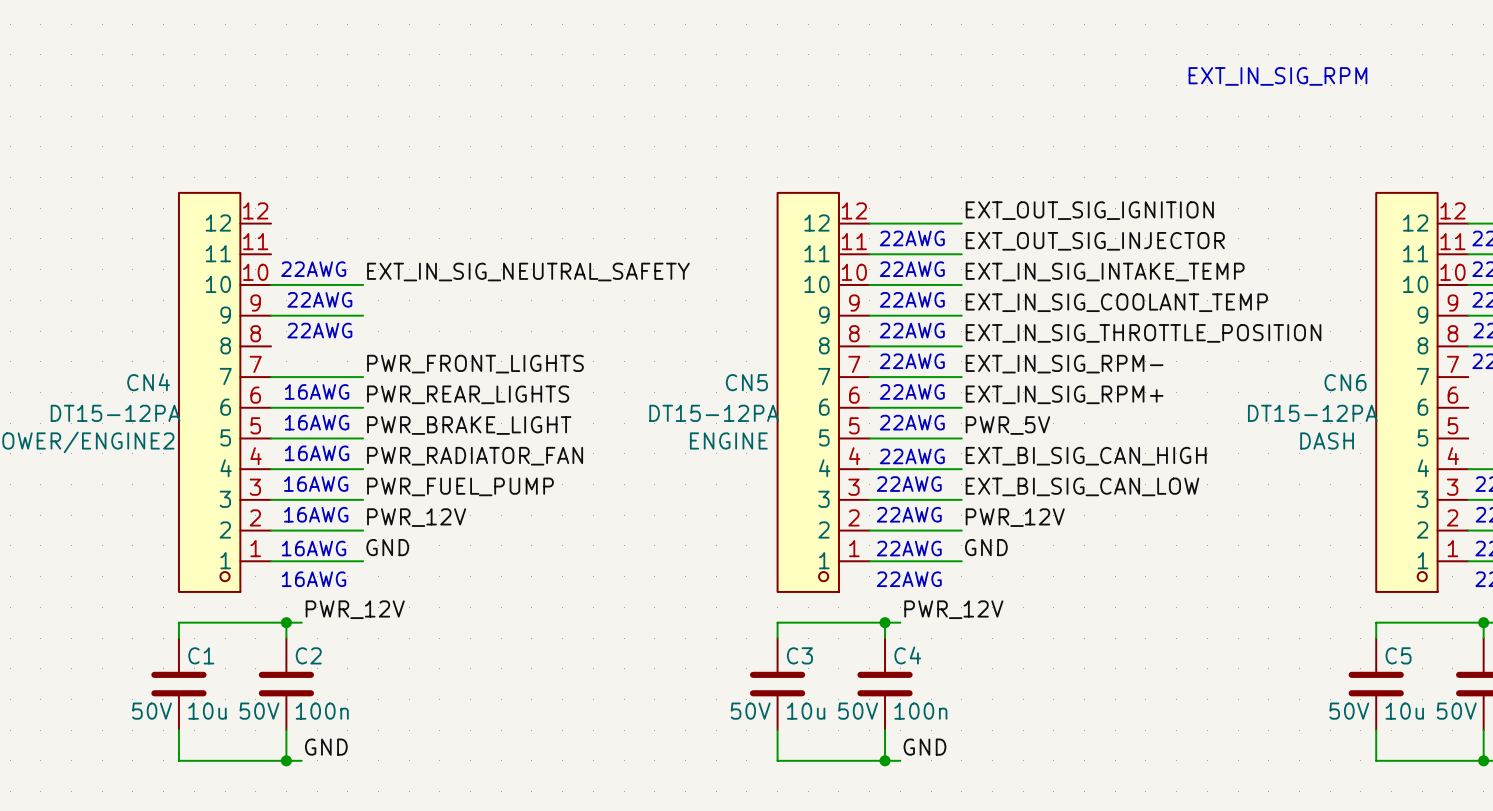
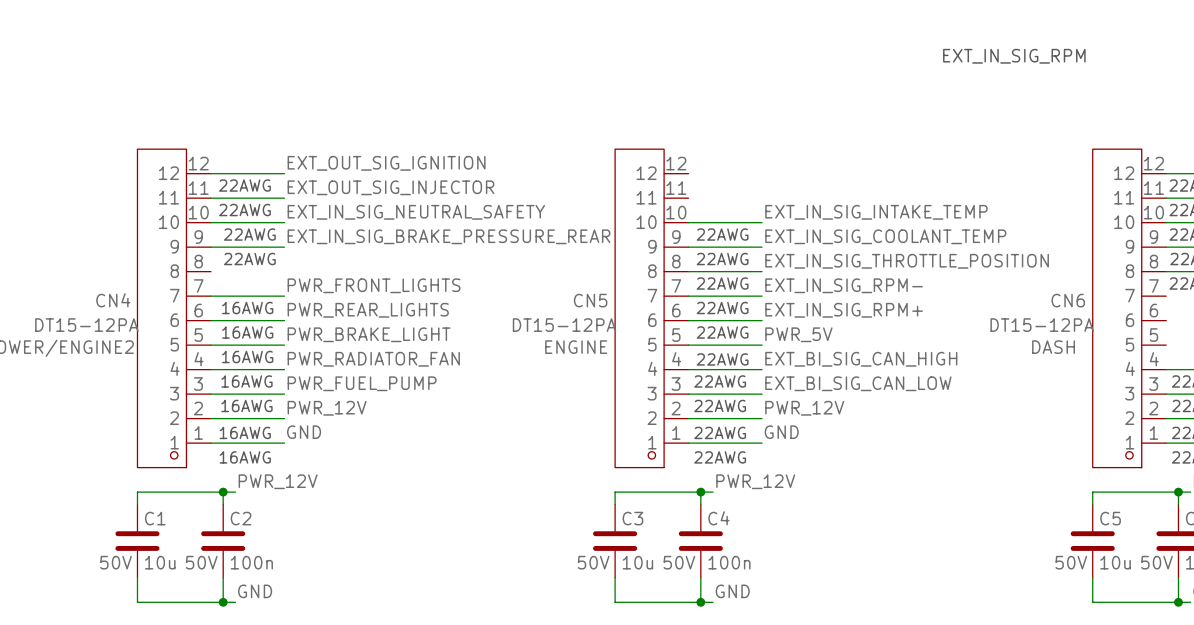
label: none -> EXT_OUT_SIG_IGNITION (386, 163)
label: EXT_OUT_SIG_IGNITION (1089, 210) -> none
wire: none -> (210, 173) (284, 173)
wire: (869, 223) (961, 223) -> none
text: none -> 22AWG (244, 185)
text: 22AWG (912, 238) -> none
label: none -> EXT_OUT_SIG_INJECTOR (390, 187)
label: EXT_OUT_SIG_INJECTOR (1095, 241) -> none
wire: none -> (210, 198) (284, 198)
wire: (869, 254) (961, 254) -> none
text: 22AWG (912, 269) -> none
label: none -> EXT_IN_SIG_BRAKE_PRESSURE_REAR (448, 236)

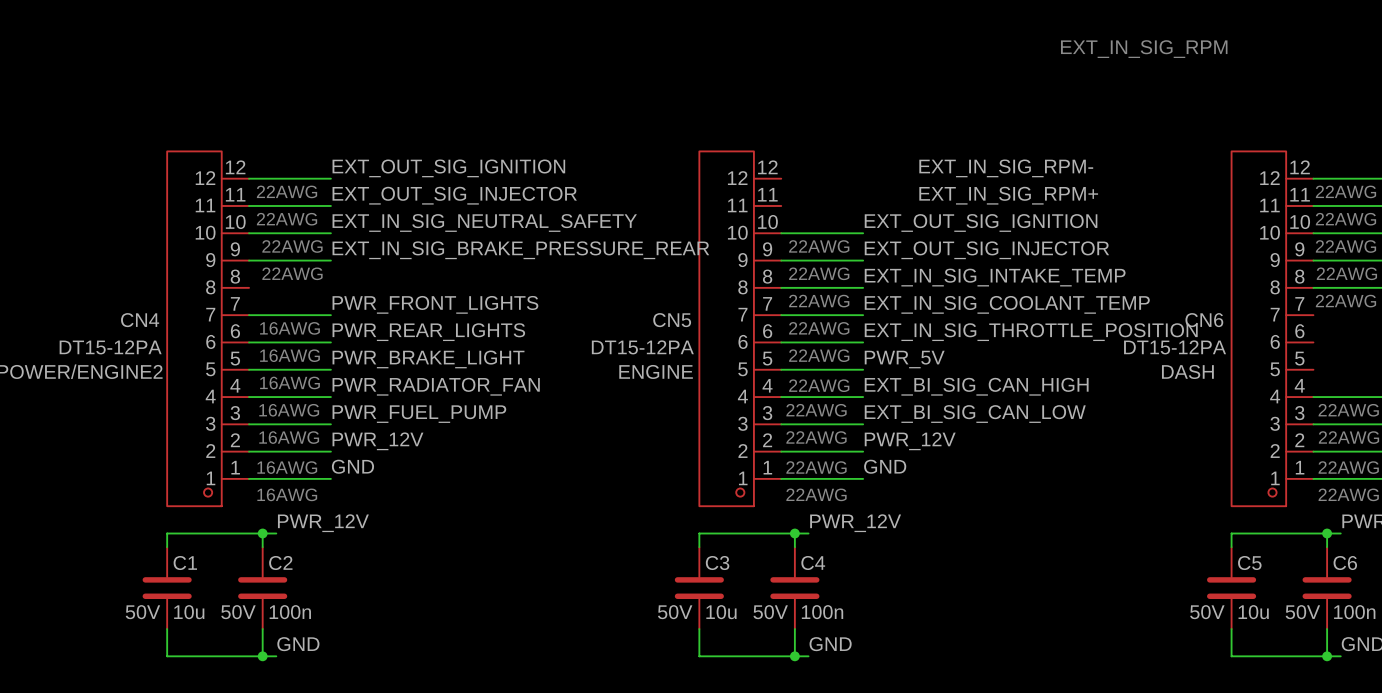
label: none -> EXT_IN_SIG_RPM- (1006, 168)
label: none -> EXT_IN_SIG_RPM+ (1008, 195)
label: EXT_IN_SIG_INTAKE_TEMP (876, 212) -> EXT_OUT_SIG_IGNITION (981, 222)
label: EXT_IN_SIG_COOLANT_TEMP (885, 236) -> EXT_OUT_SIG_INJECTOR (986, 250)
label: EXT_IN_SIG_THROTTLE_POSITION (907, 261) -> EXT_IN_SIG_INTAKE_TEMP (995, 277)
label: EXT_IN_SIG_RPM- (844, 285) -> EXT_IN_SIG_COOLANT_TEMP (1007, 304)
label: EXT_IN_SIG_RPM+ (844, 310) -> EXT_IN_SIG_THROTTLE_POSITION (1031, 332)

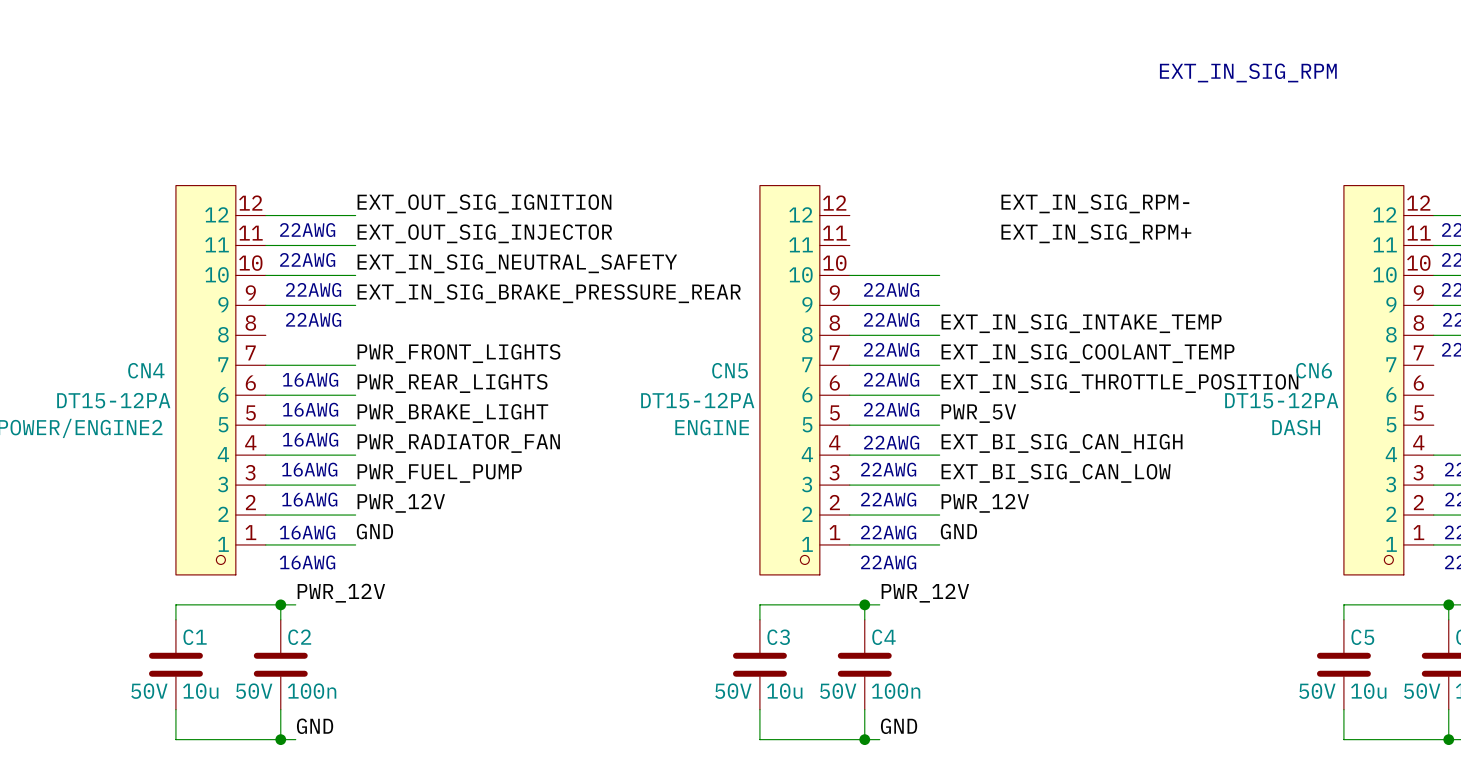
label: EXT_OUT_SIG_IGNITION (981, 222) -> none
label: EXT_OUT_SIG_INJECTOR (986, 250) -> none

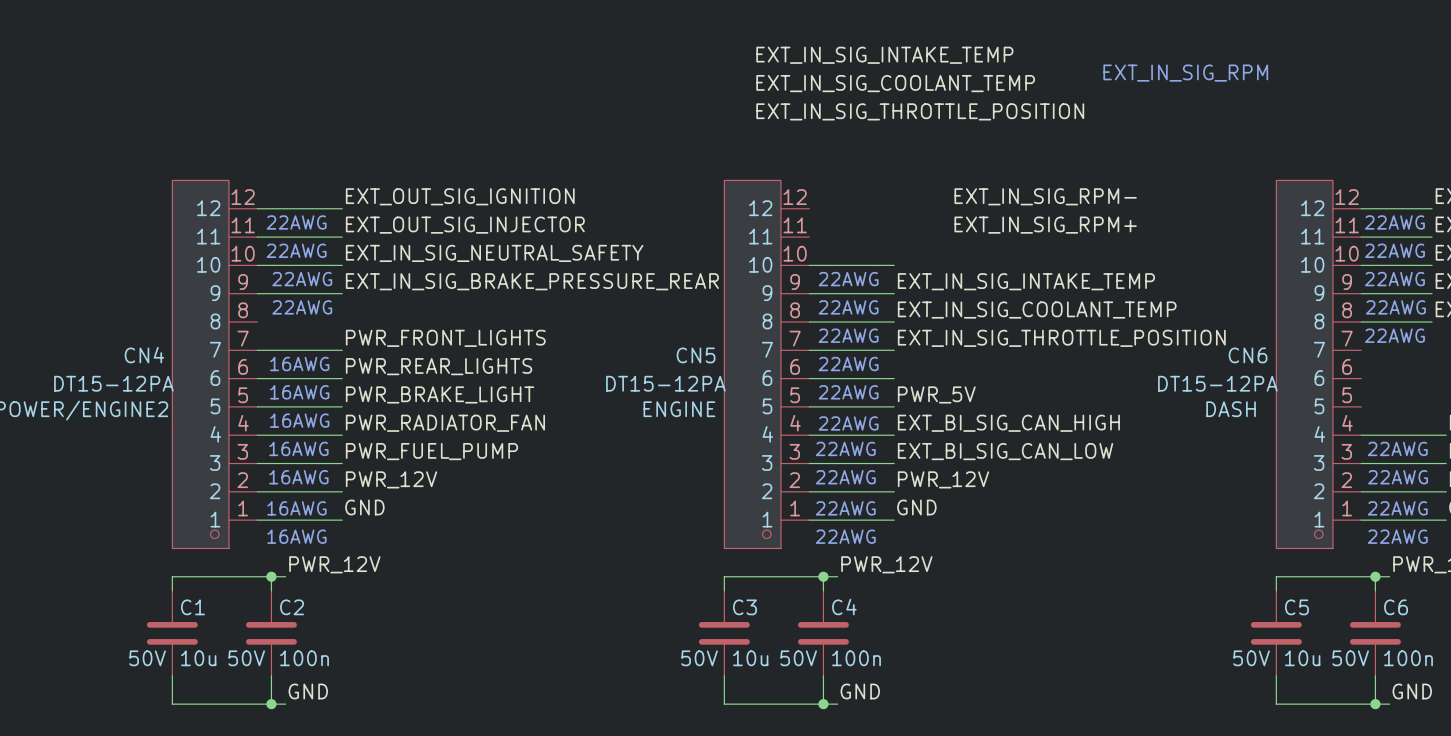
label: none -> EXT_IN_SIG_INTAKE_TEMP (884, 55)
label: none -> EXT_IN_SIG_COOLANT_TEMP (895, 83)
label: none -> EXT_IN_SIG_THROTTLE_POSITION (920, 111)
label: none -> EXT_IN_SIG_INTAKE_TEMP (1026, 281)
label: EXT_IN_SIG_INTAKE_TEMP (1081, 323) -> EXT_IN_SIG_COOLANT_TEMP (1037, 310)
label: EXT_IN_SIG_COOLANT_TEMP (1088, 353) -> EXT_IN_SIG_THROTTLE_POSITION (1061, 338)
label: EXT_IN_SIG_THROTTLE_POSITION (1119, 383) -> none

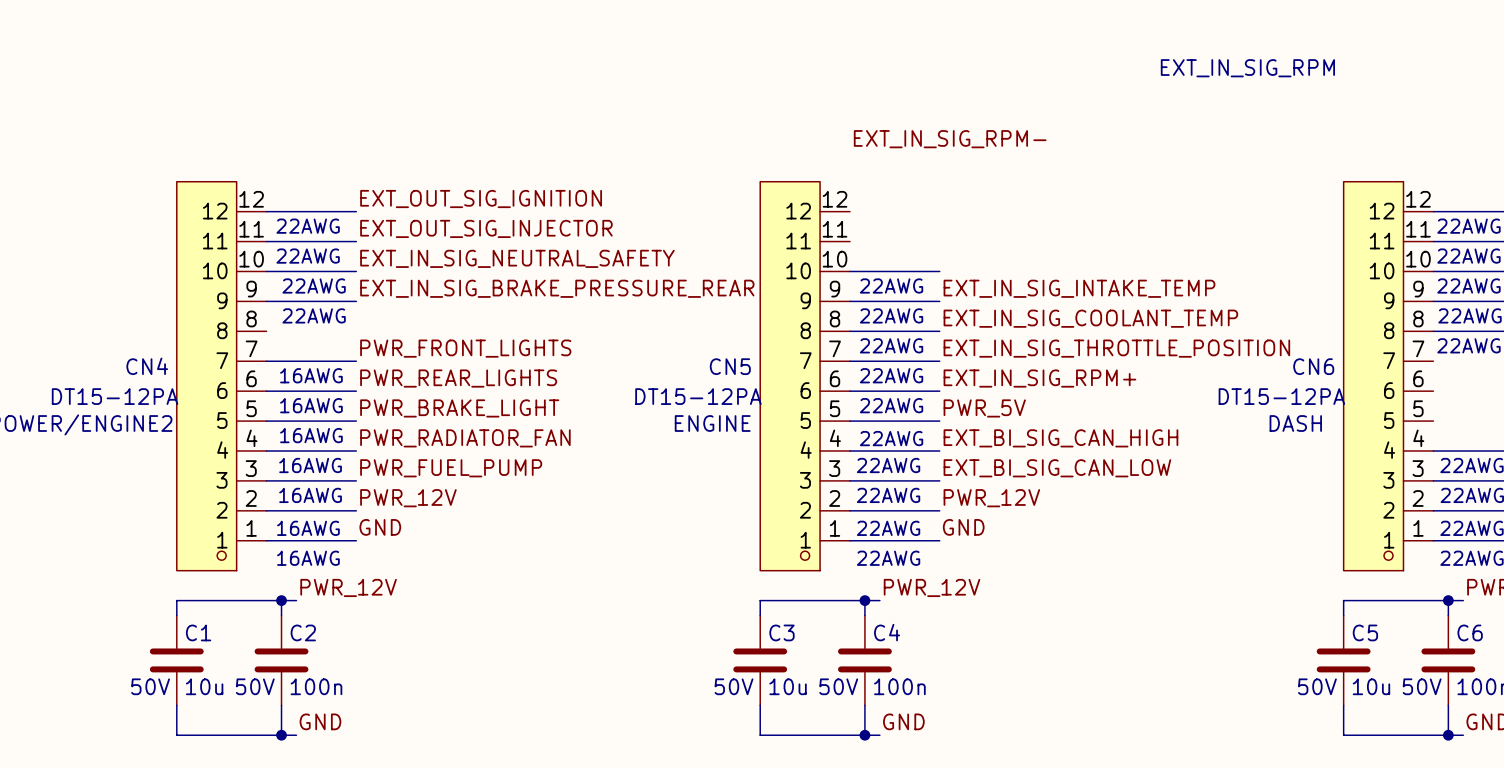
label: EXT_IN_SIG_INTAKE_TEMP (884, 55) -> none
label: EXT_IN_SIG_COOLANT_TEMP (895, 83) -> none
label: EXT_IN_SIG_THROTTLE_POSITION (920, 111) -> none
label position: EXT_IN_SIG_RPM- (1045, 196) -> EXT_IN_SIG_RPM- (950, 139)
label position: EXT_IN_SIG_RPM+ (1045, 225) -> EXT_IN_SIG_RPM+ (1039, 378)

